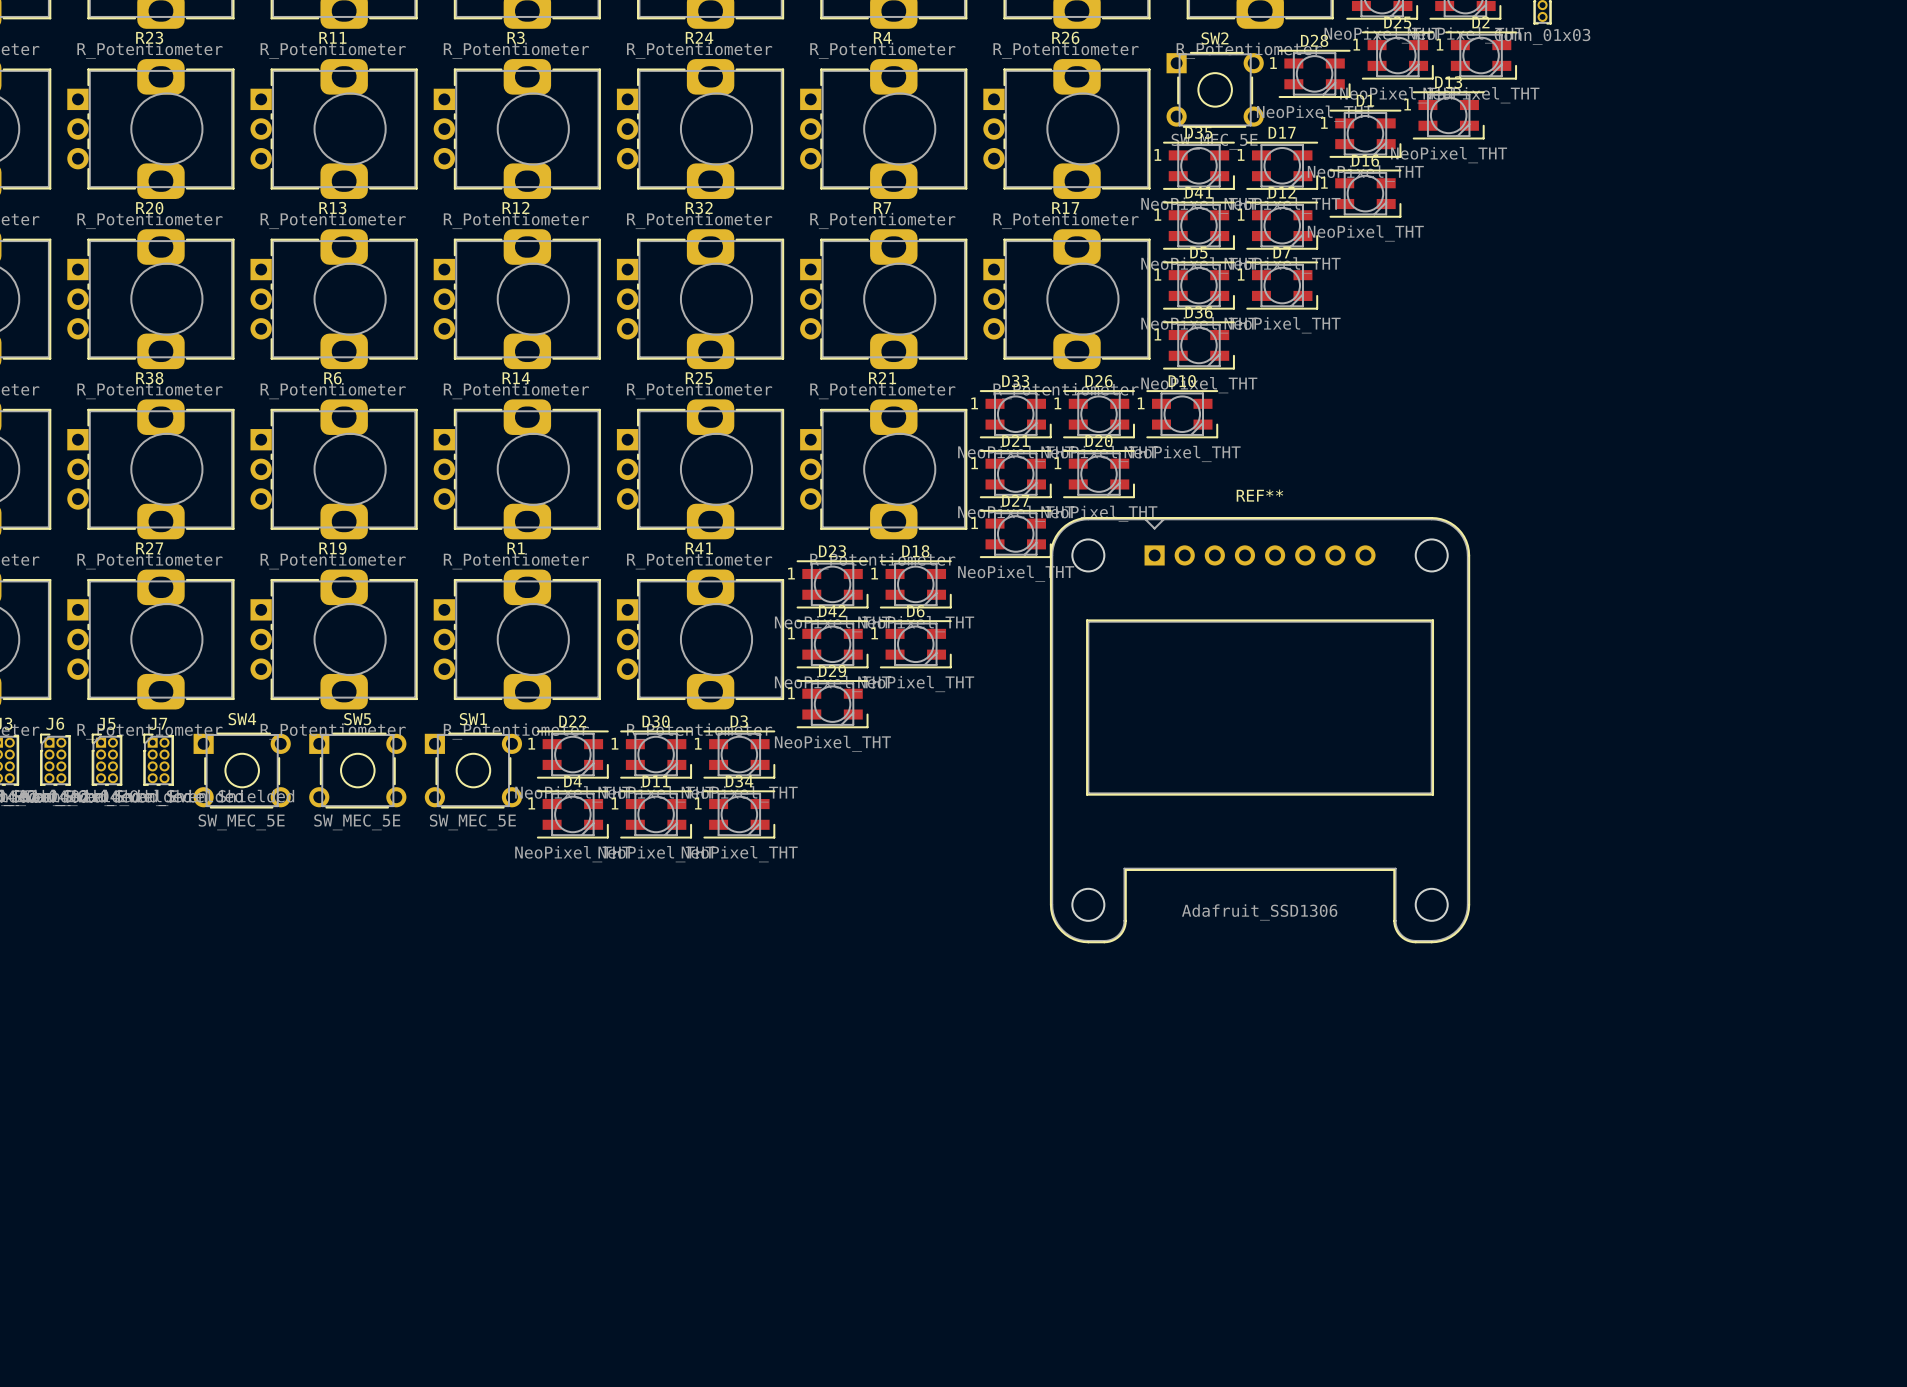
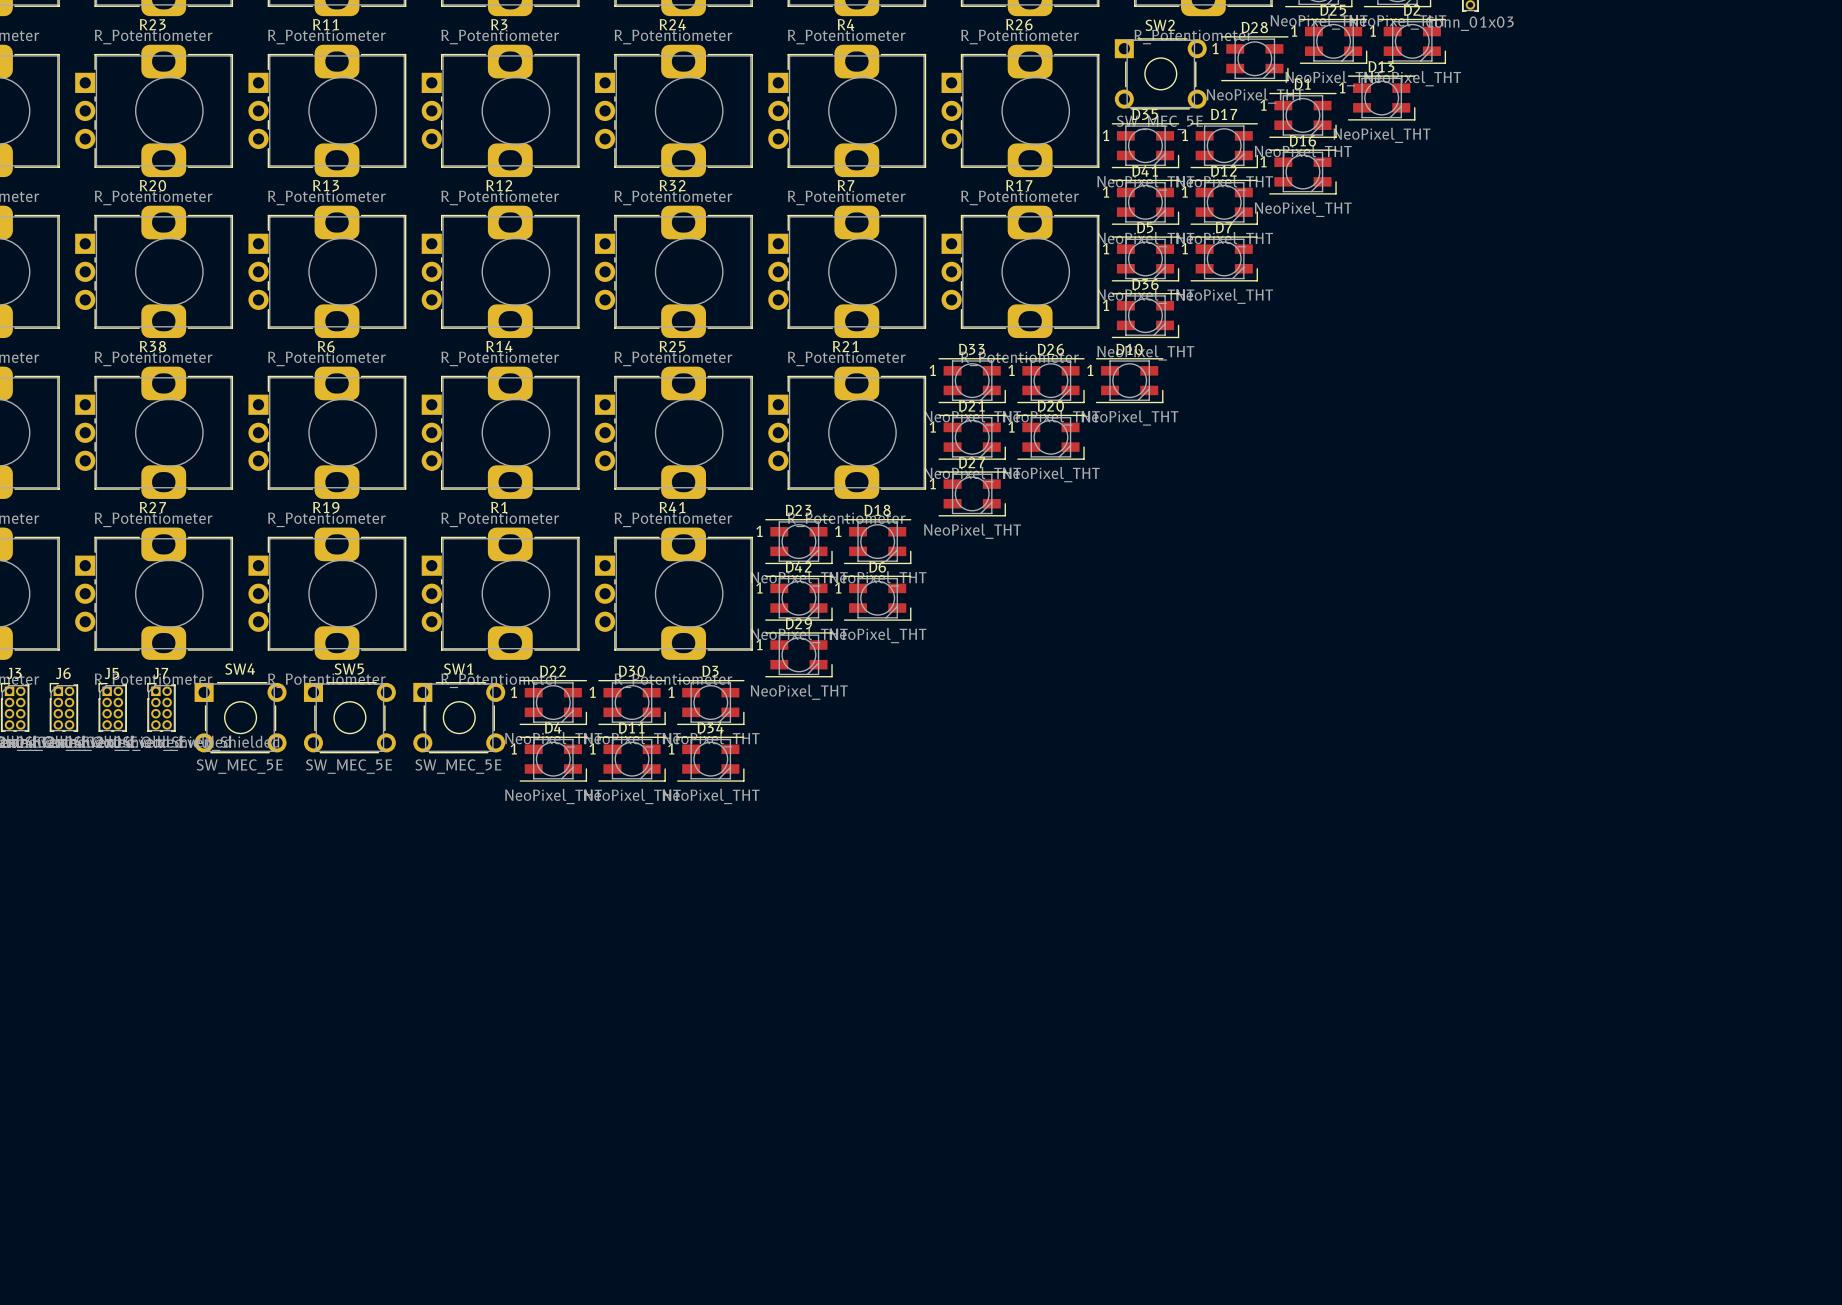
REF**: Adafruit_SSD1306 (1260, 730) -> none

